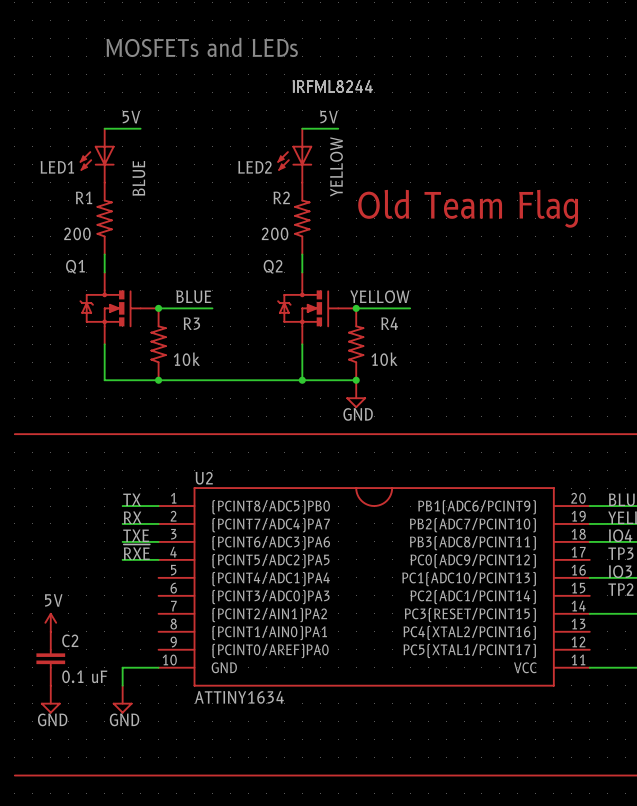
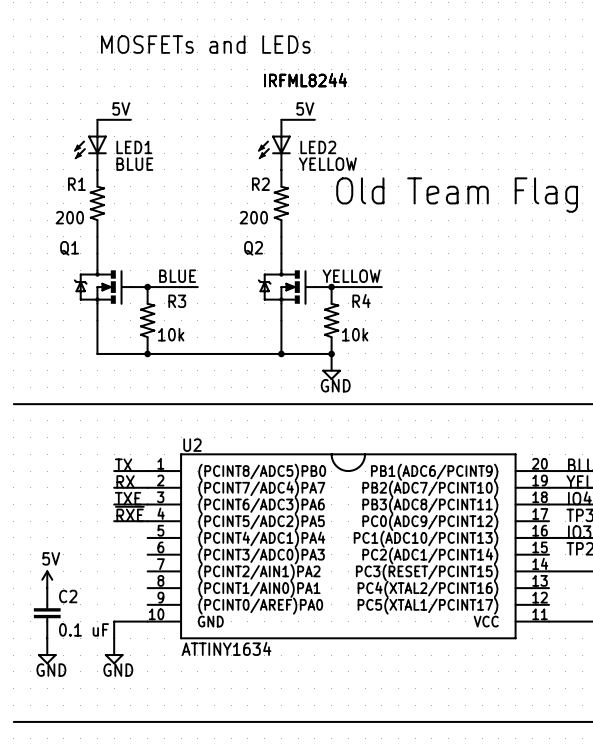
LED2 value rotation: 0° (336, 166) -> 90° clockwise (327, 164)
LED1 name position: LED1 (57, 167) -> LED1 (134, 147)
LED2 name position: LED2 (255, 167) -> LED2 (318, 147)
LED1 value rotation: 0° (138, 178) -> 90° clockwise (134, 164)

